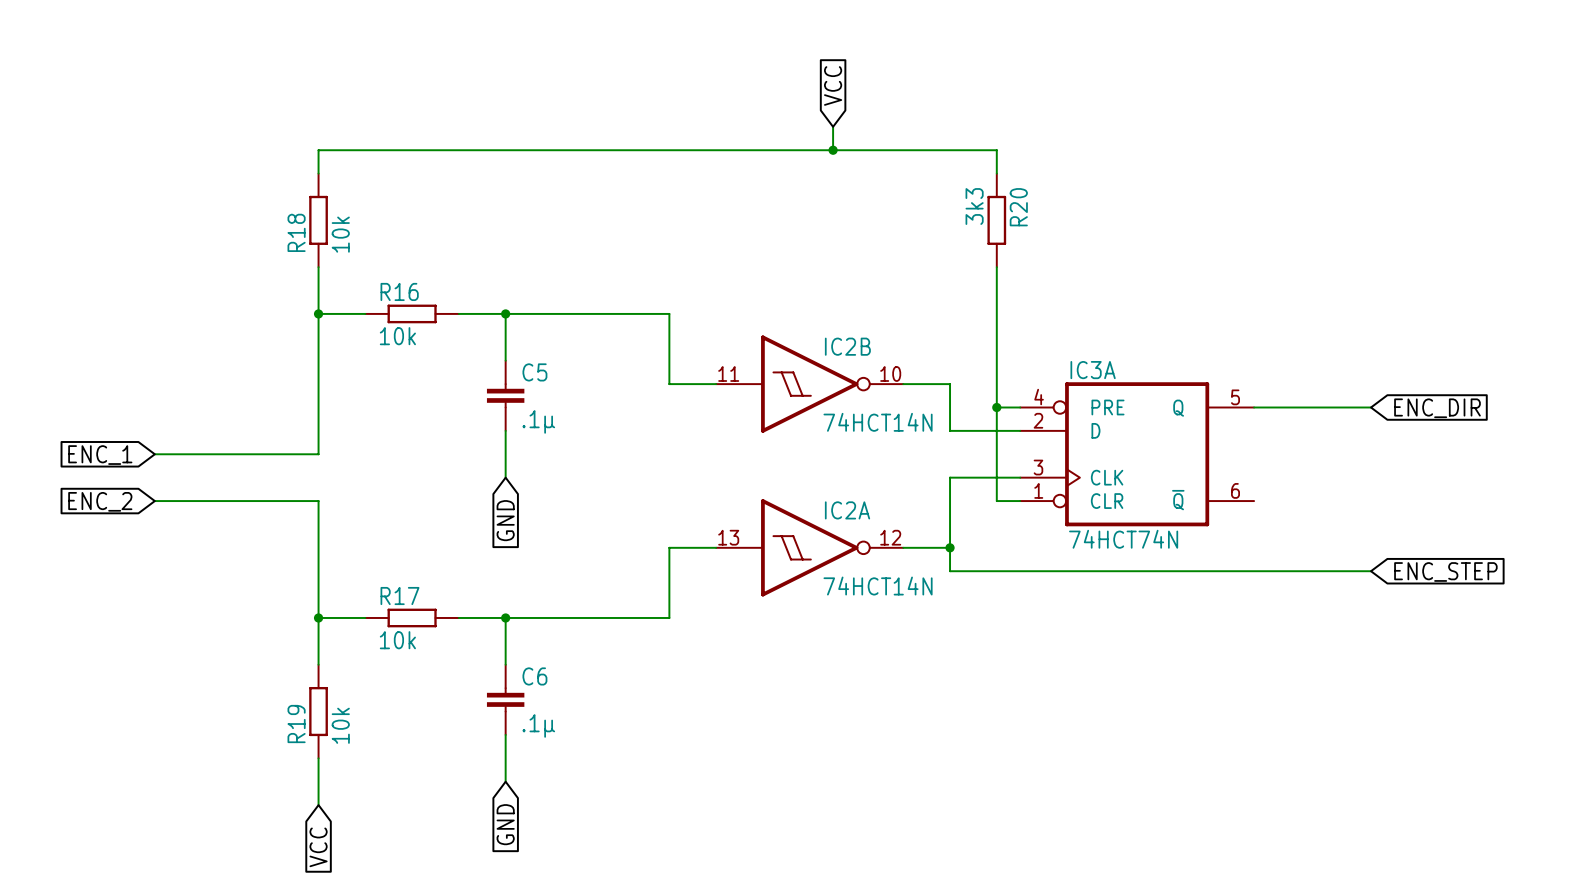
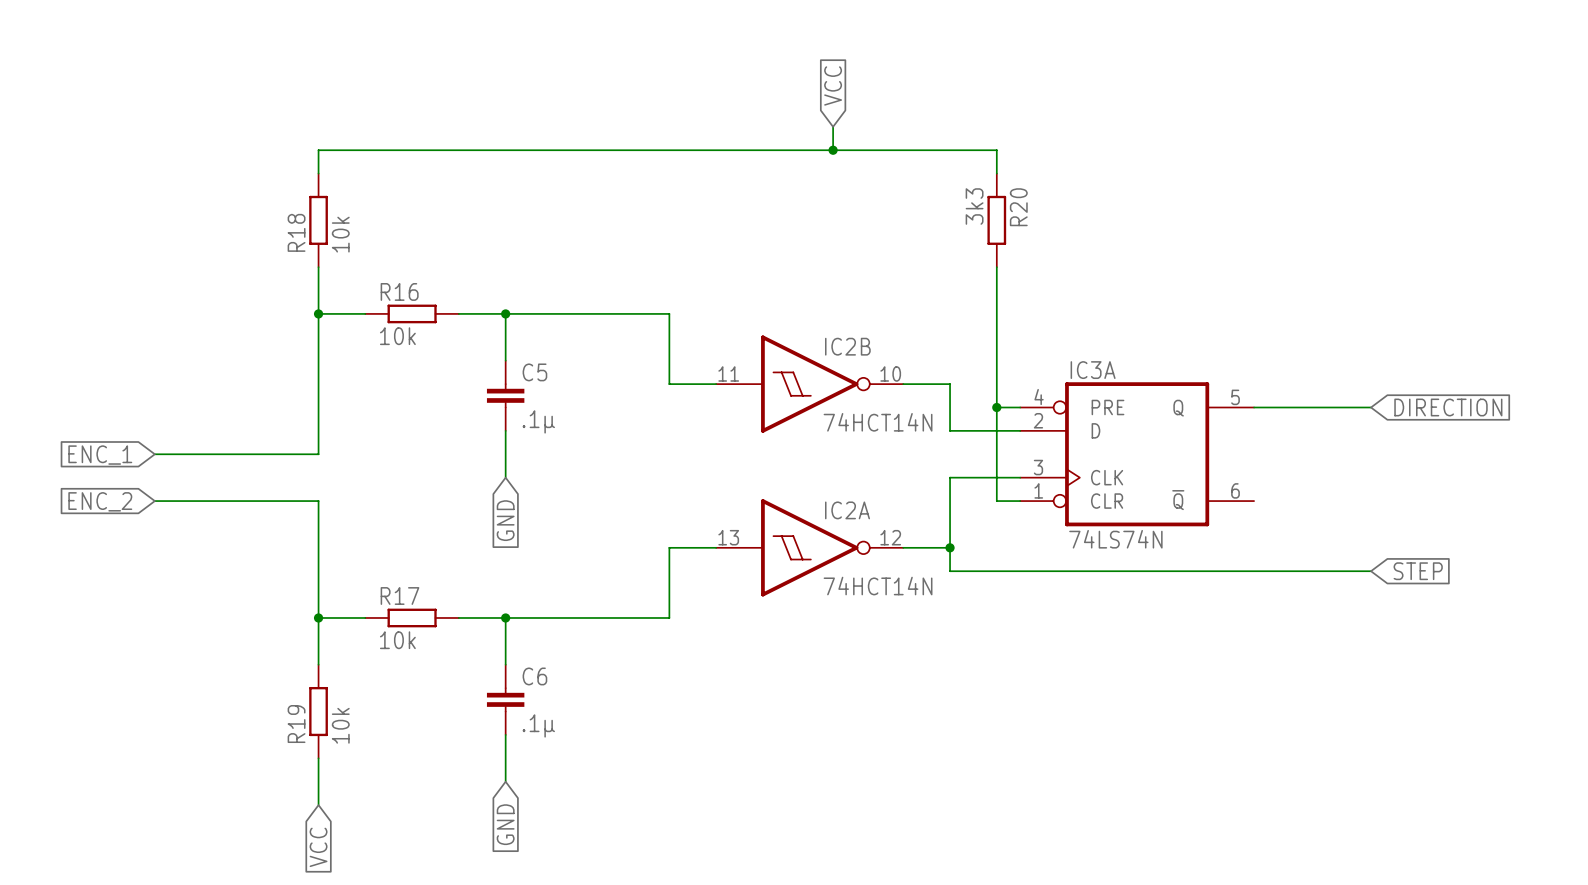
global label: ENC_DIR (1437, 408) -> DIRECTION (1448, 407)
IC3A value: 74HCT74N (1123, 539) -> 74LS74N (1115, 539)
global label: ENC_STEP (1445, 571) -> STEP (1418, 571)

